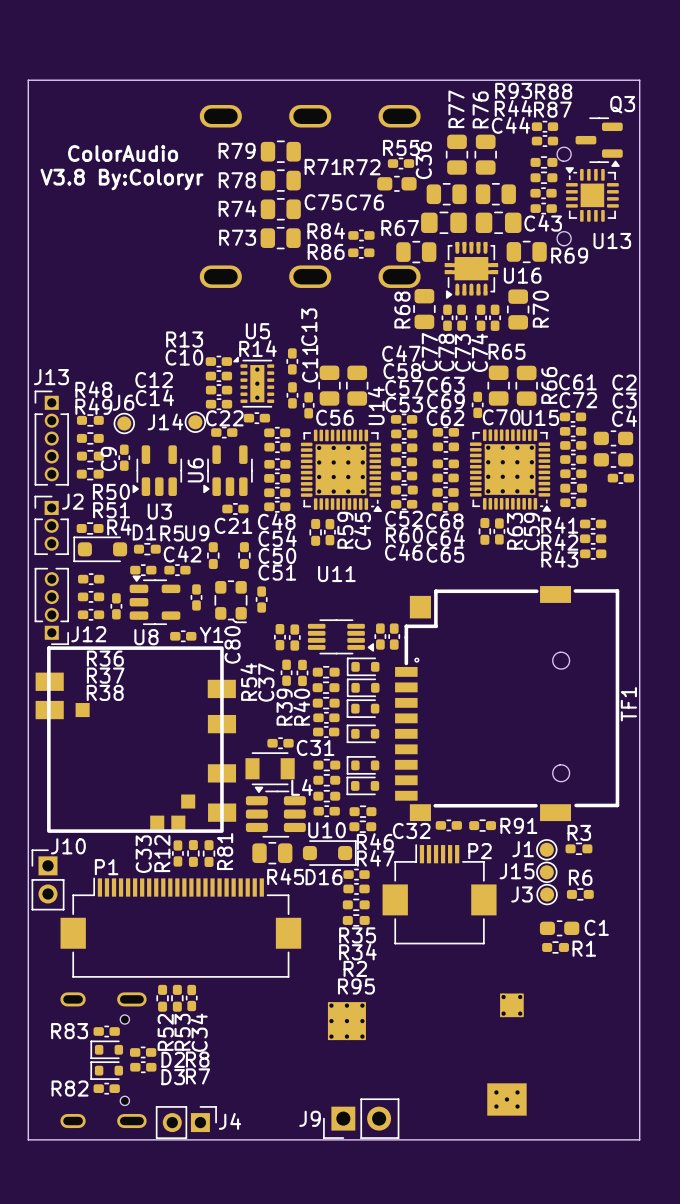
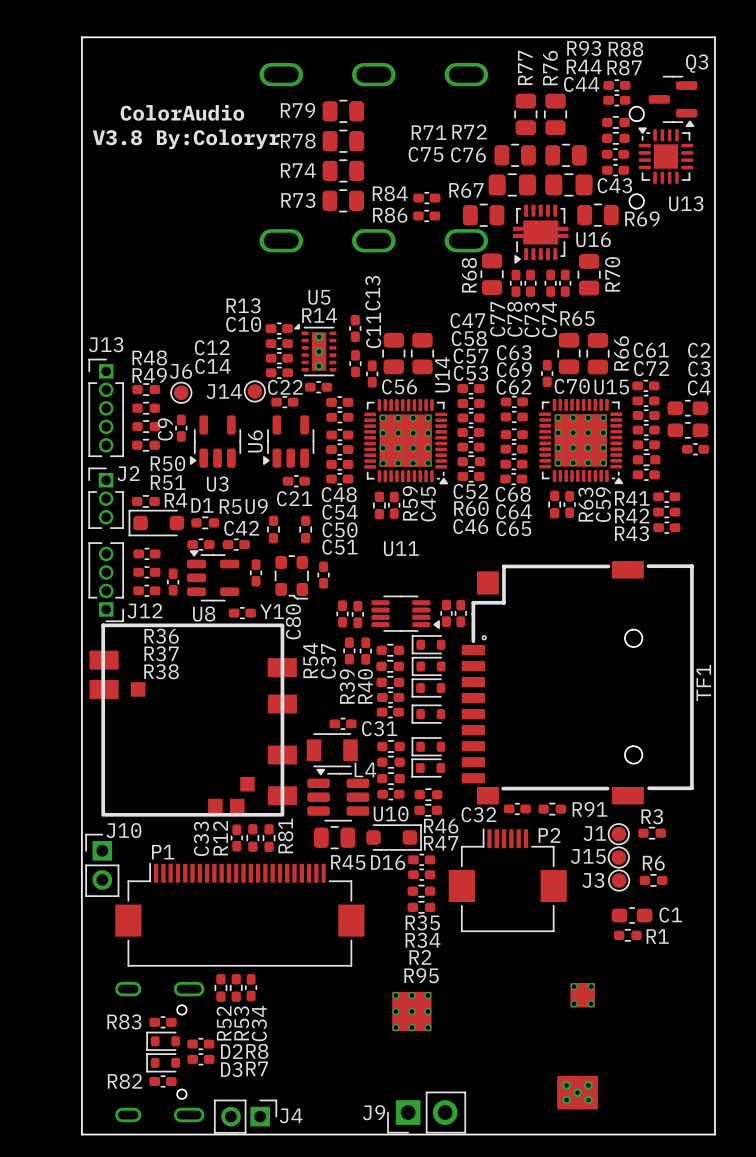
R55: (400, 163) -> none
R71 name position: R71 (323, 166) -> R71 (429, 132)
R72 name position: R72 (362, 167) -> R72 (469, 131)
C36: (396, 183) -> none
C75 name position: C75 (323, 202) -> C75 (426, 154)
C76 name position: C76 (365, 202) -> C76 (468, 154)

